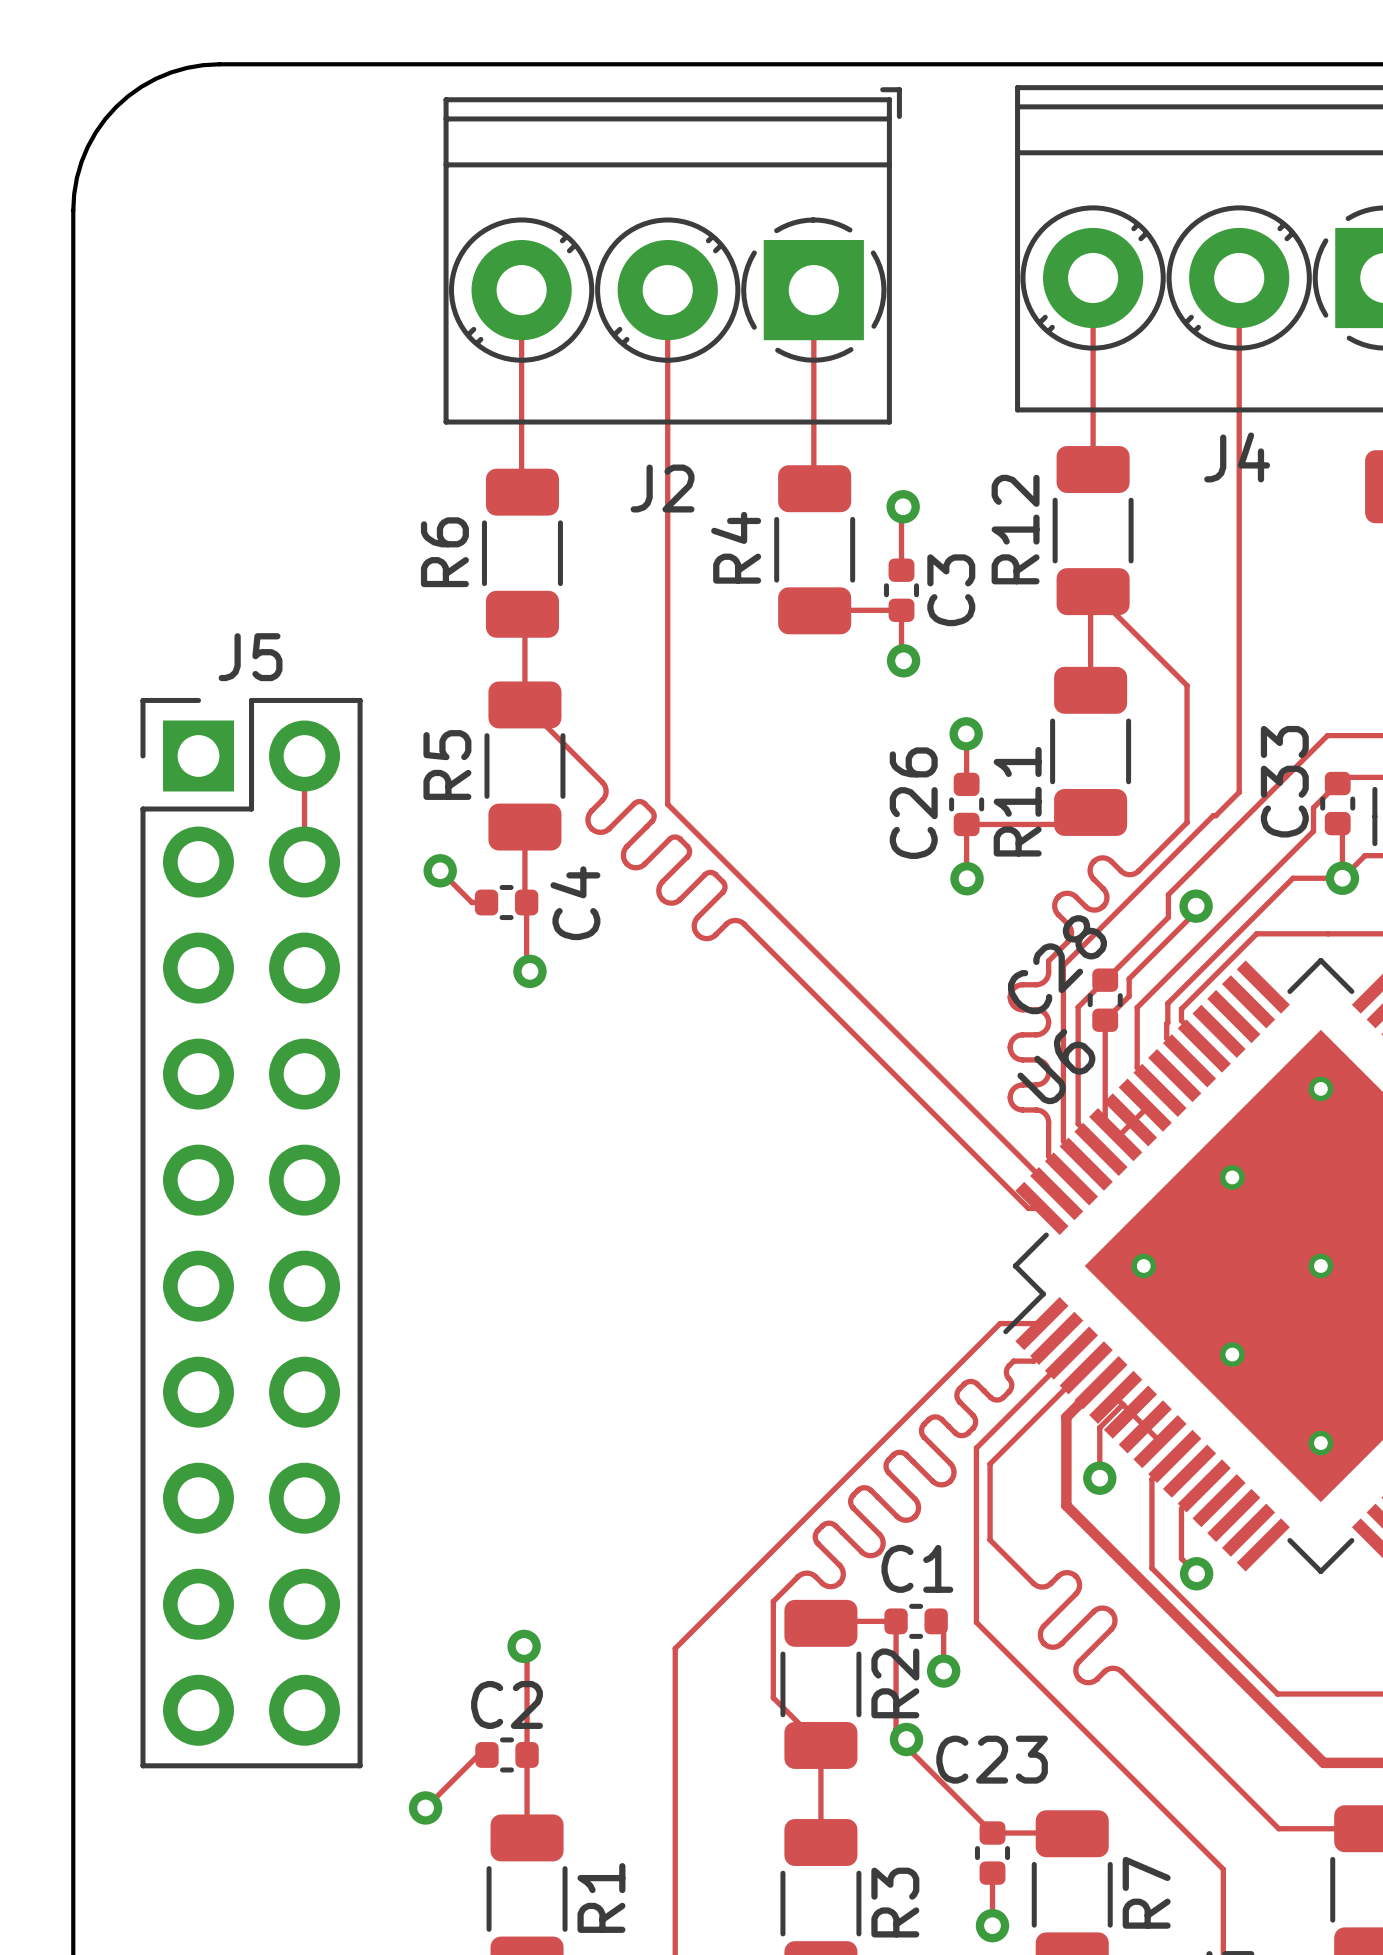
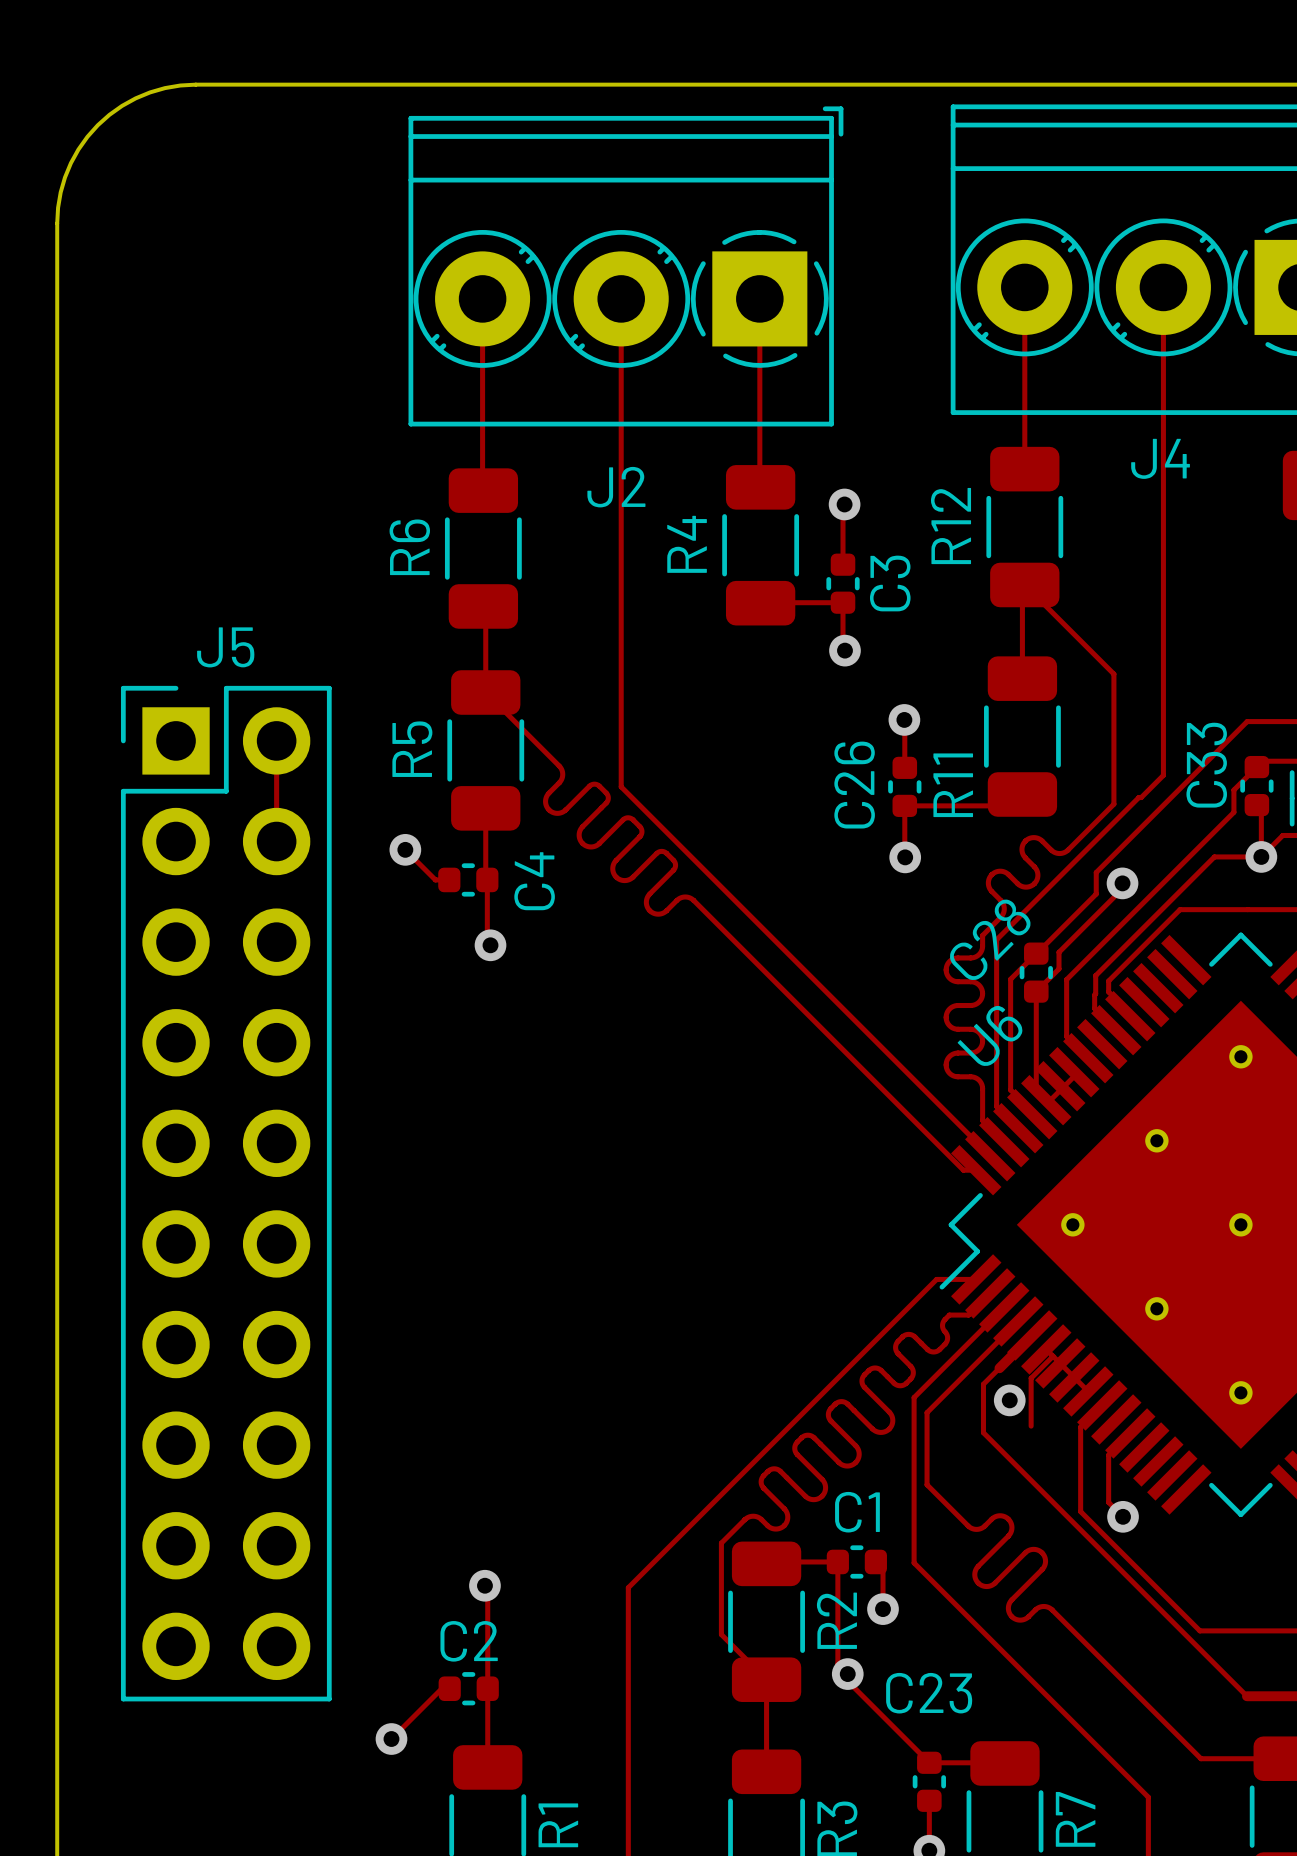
track: (1066, 1417) (1066, 1505) (1323, 1762) (1327, 1762) -> (999, 1368) (983, 1384) (983, 1432) (1246, 1696)
via position: (1099, 1478) -> (1009, 1400)

